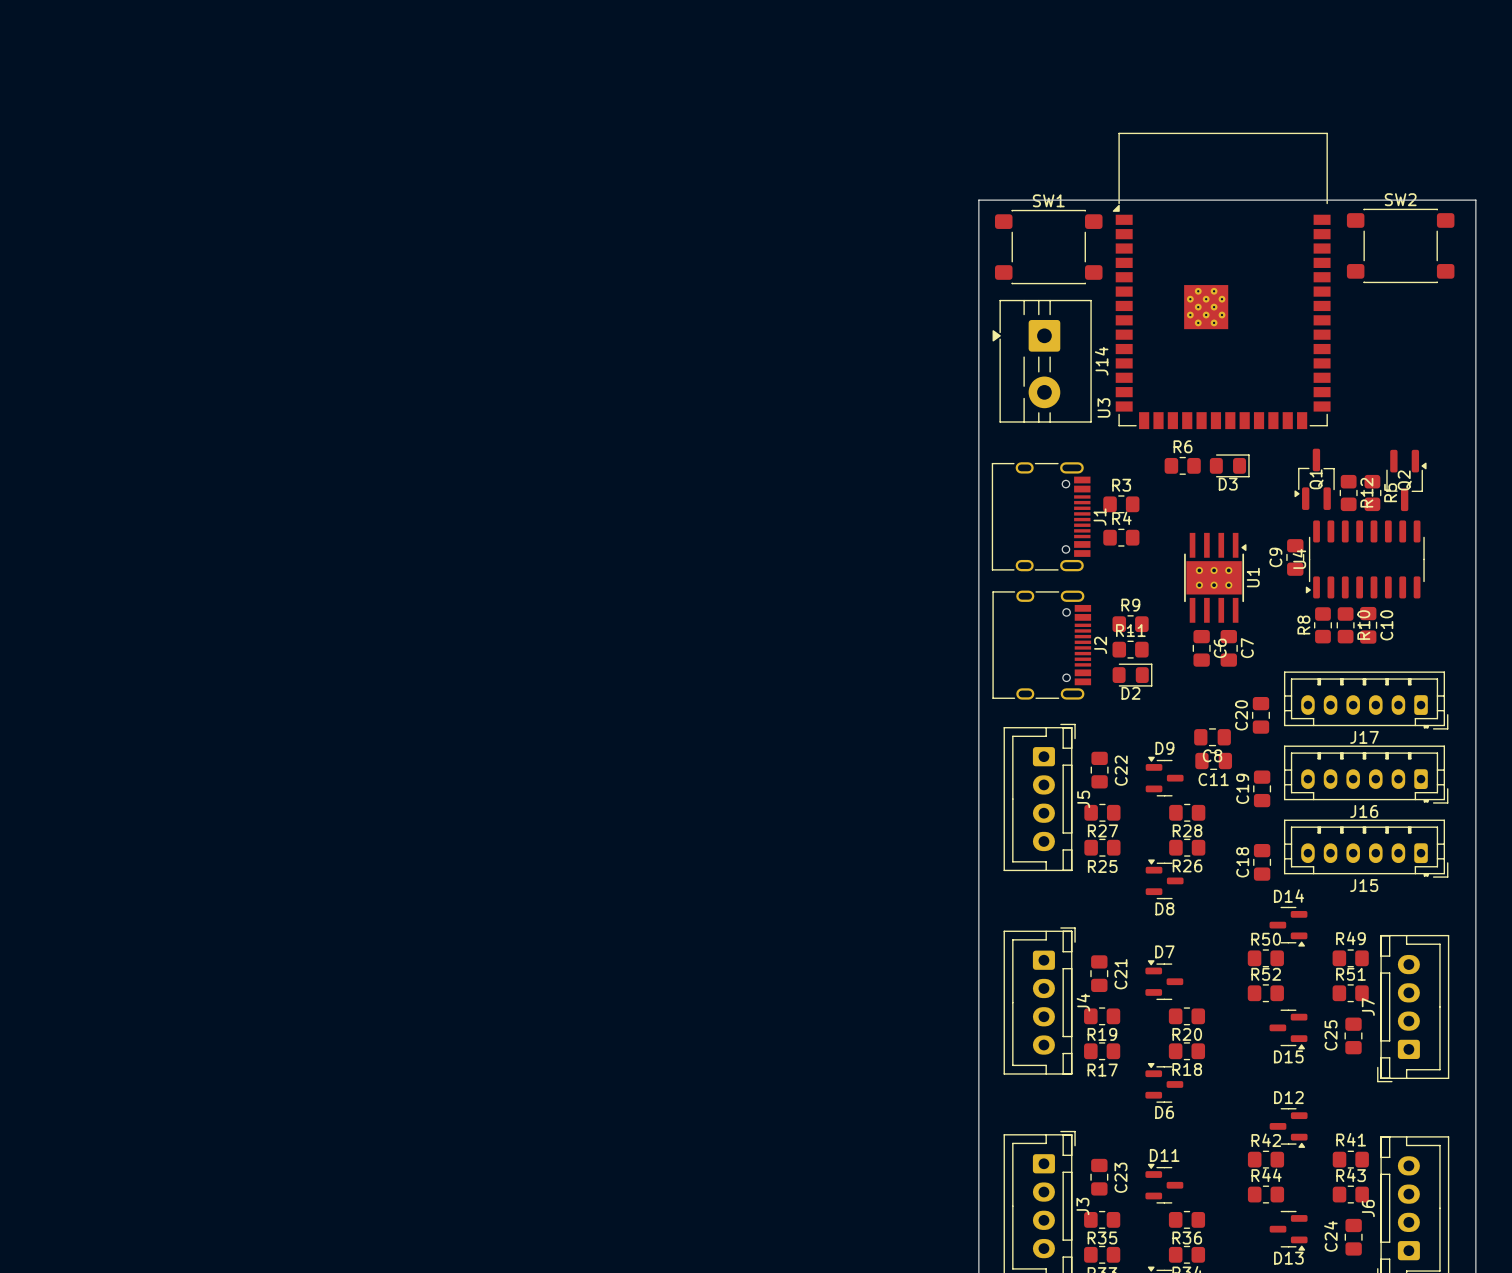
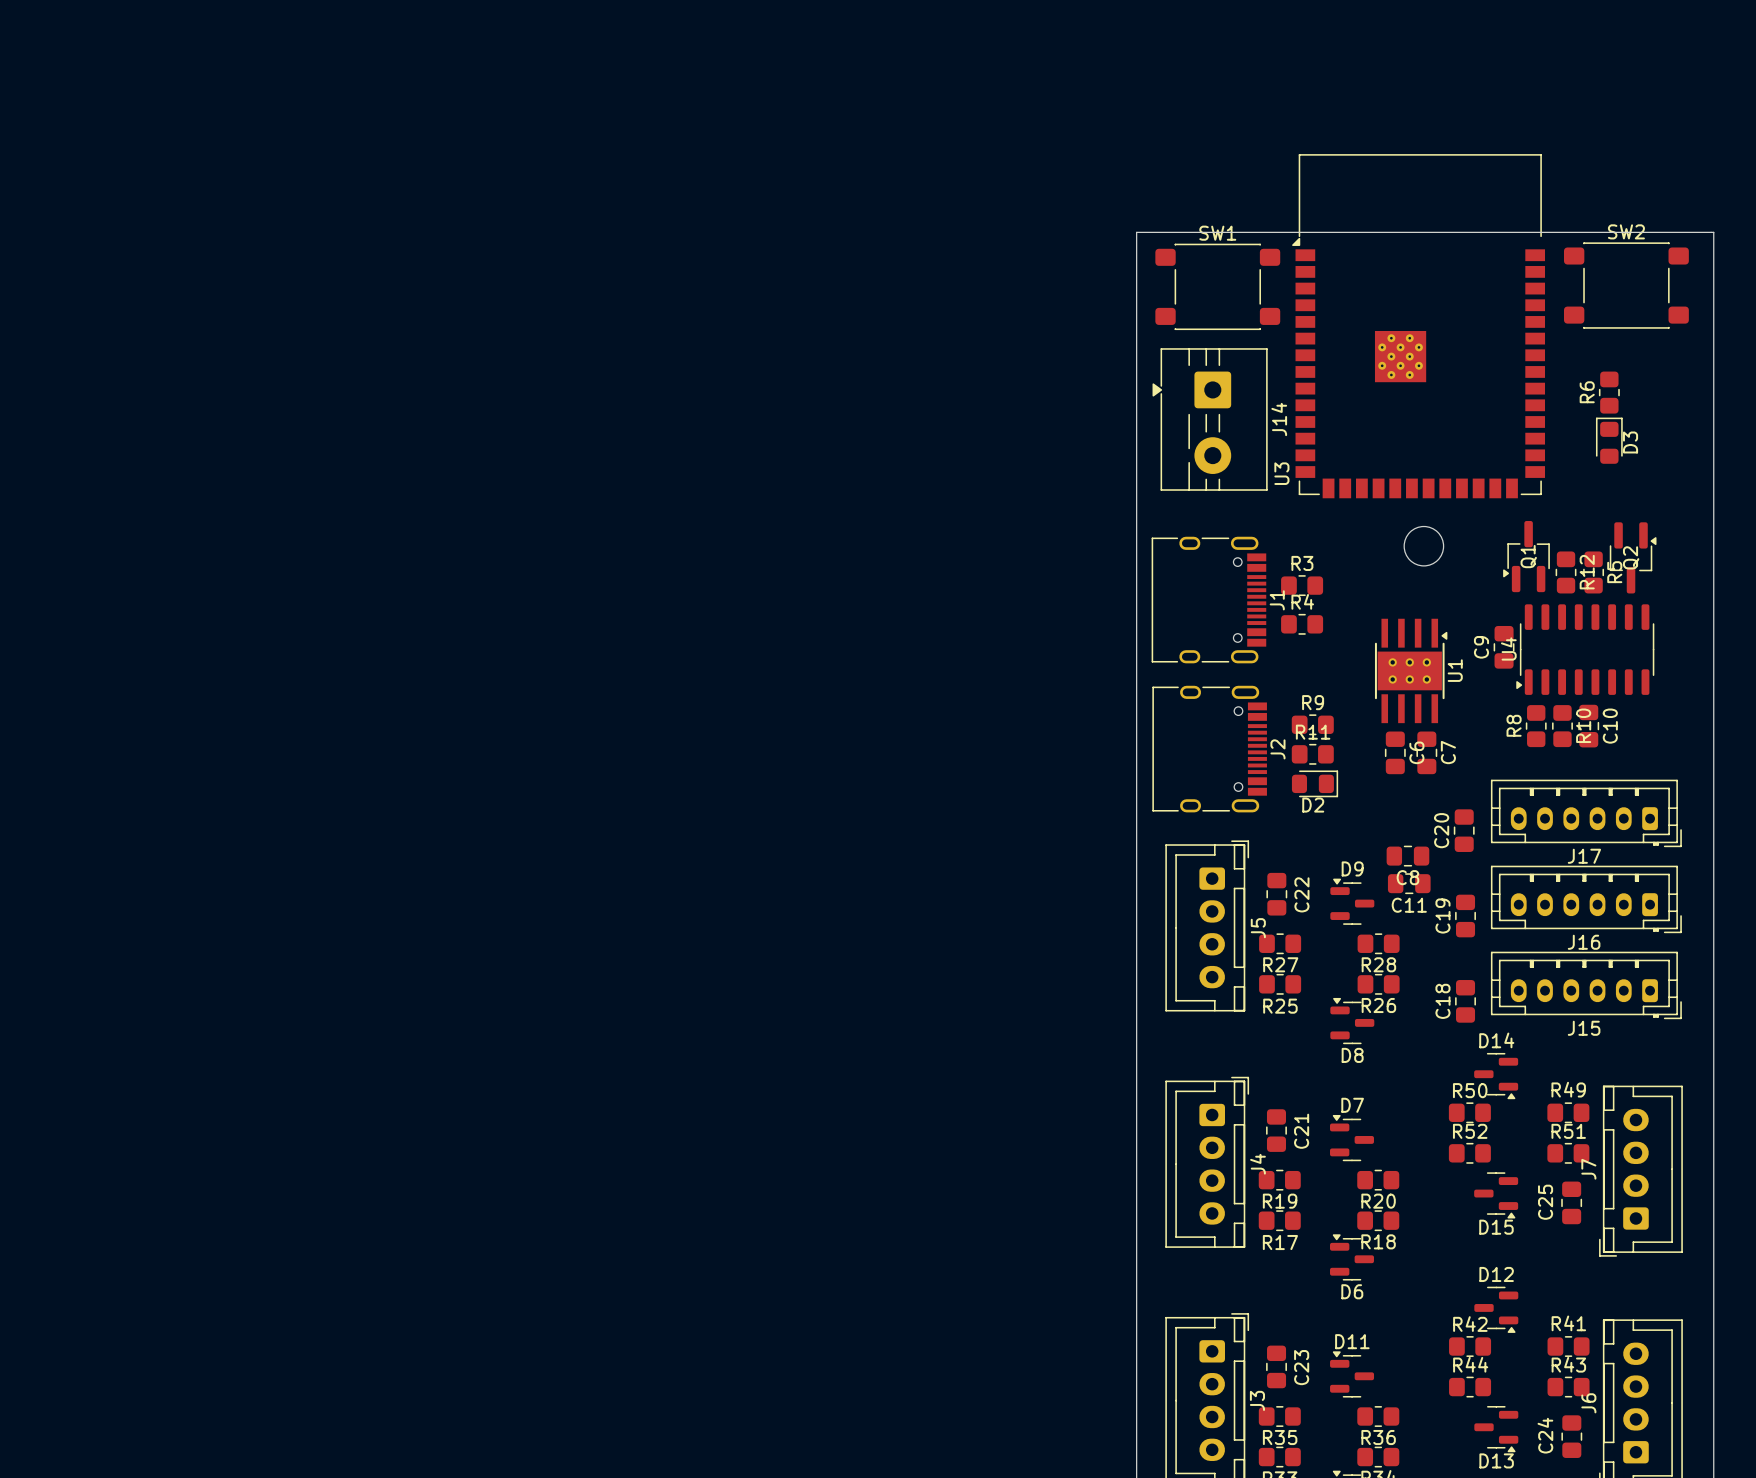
R6 name position: R6 (1182, 446) -> R6 (1587, 392)
round board edge: none -> [1403, 526, 1444, 567]
R6 rotation: 0° (1182, 465) -> 90° clockwise (1609, 392)
R6 position: (1182, 465) -> (1609, 392)
D3 rotation: 0° (1229, 465) -> 90° counterclockwise (1609, 440)
D3 position: (1229, 465) -> (1609, 440)

